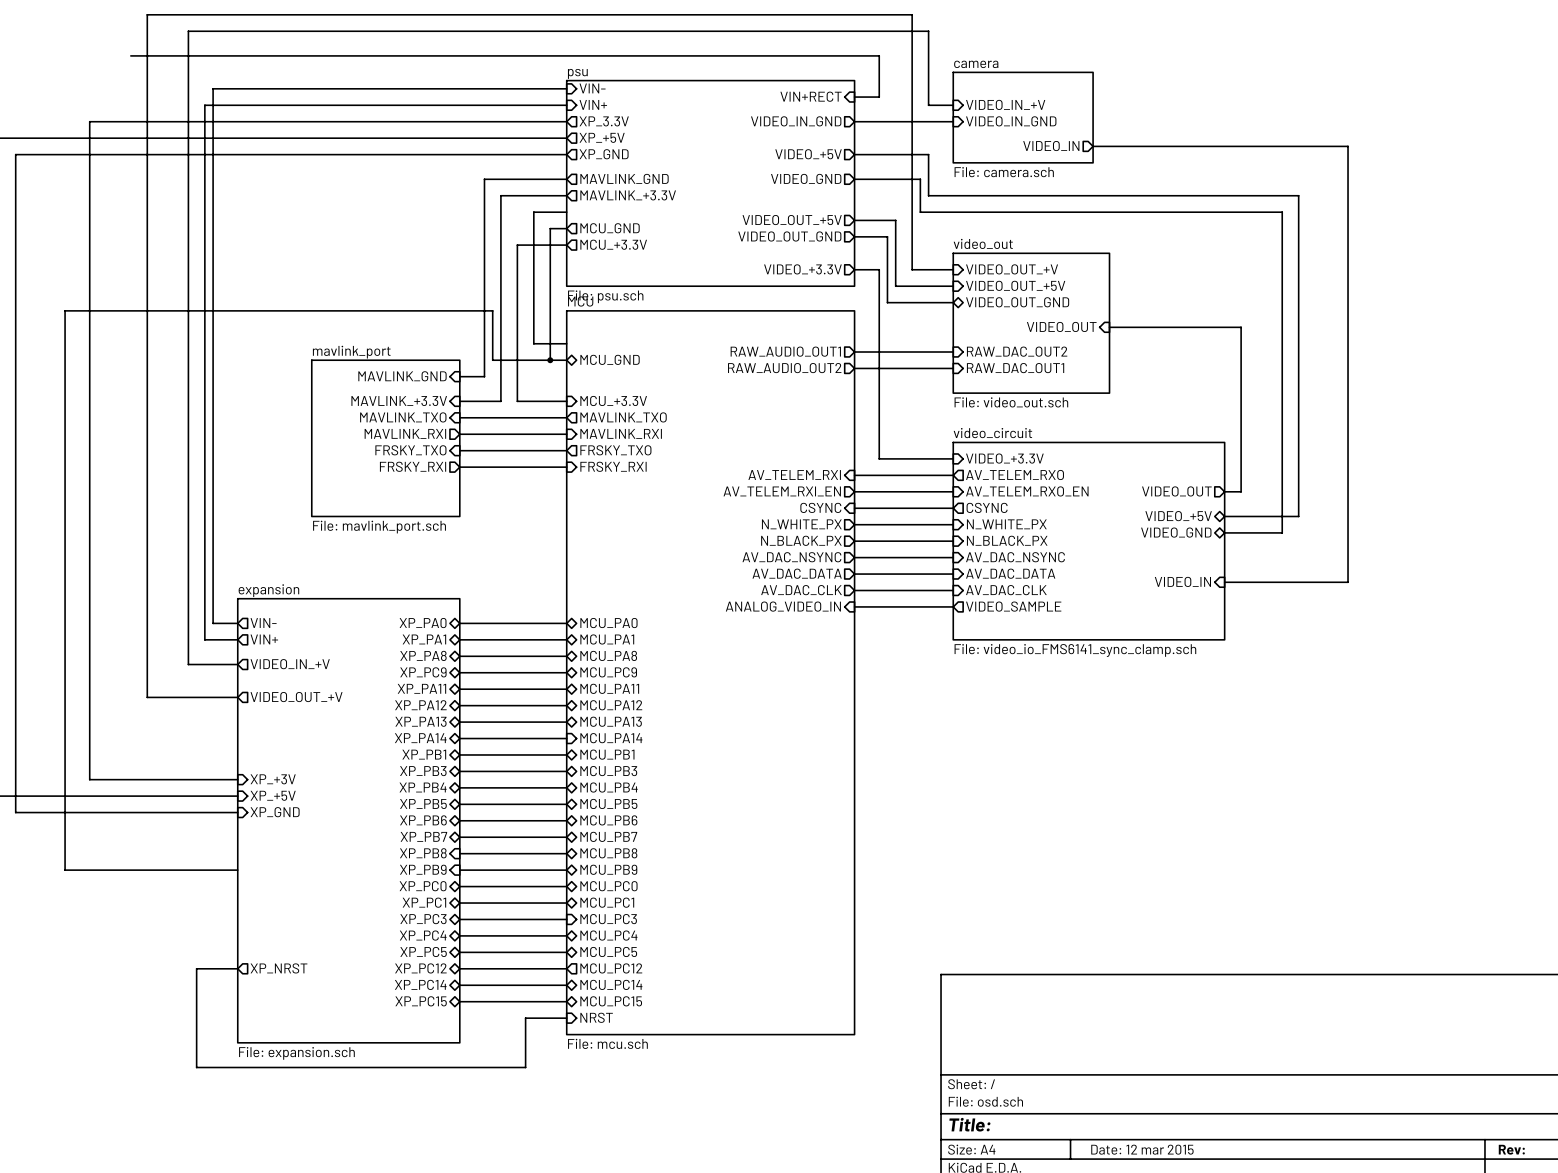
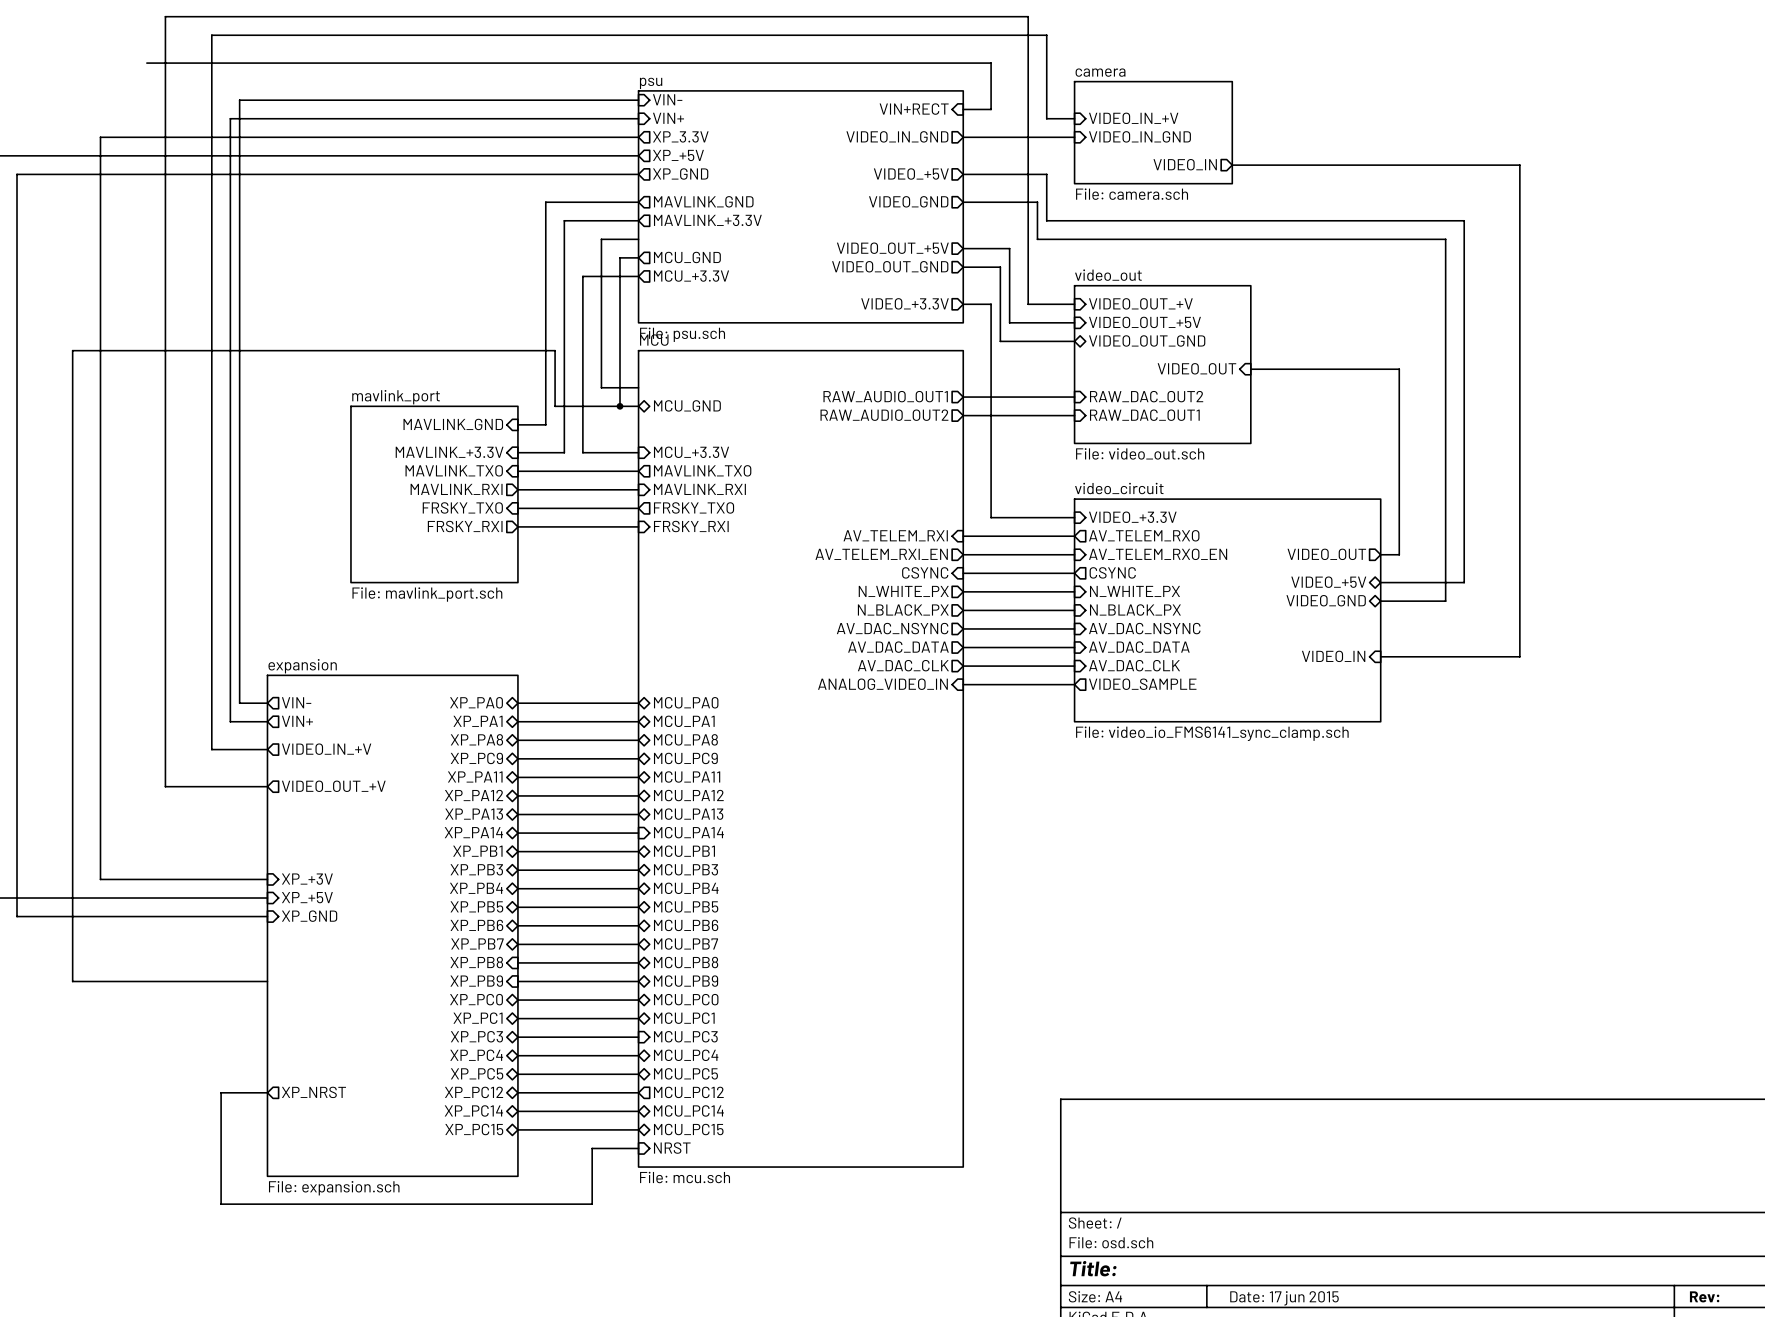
title block: Date: 12 mar 2015 (1142, 1149) -> Date: 17 jun 2015 (1284, 1298)

